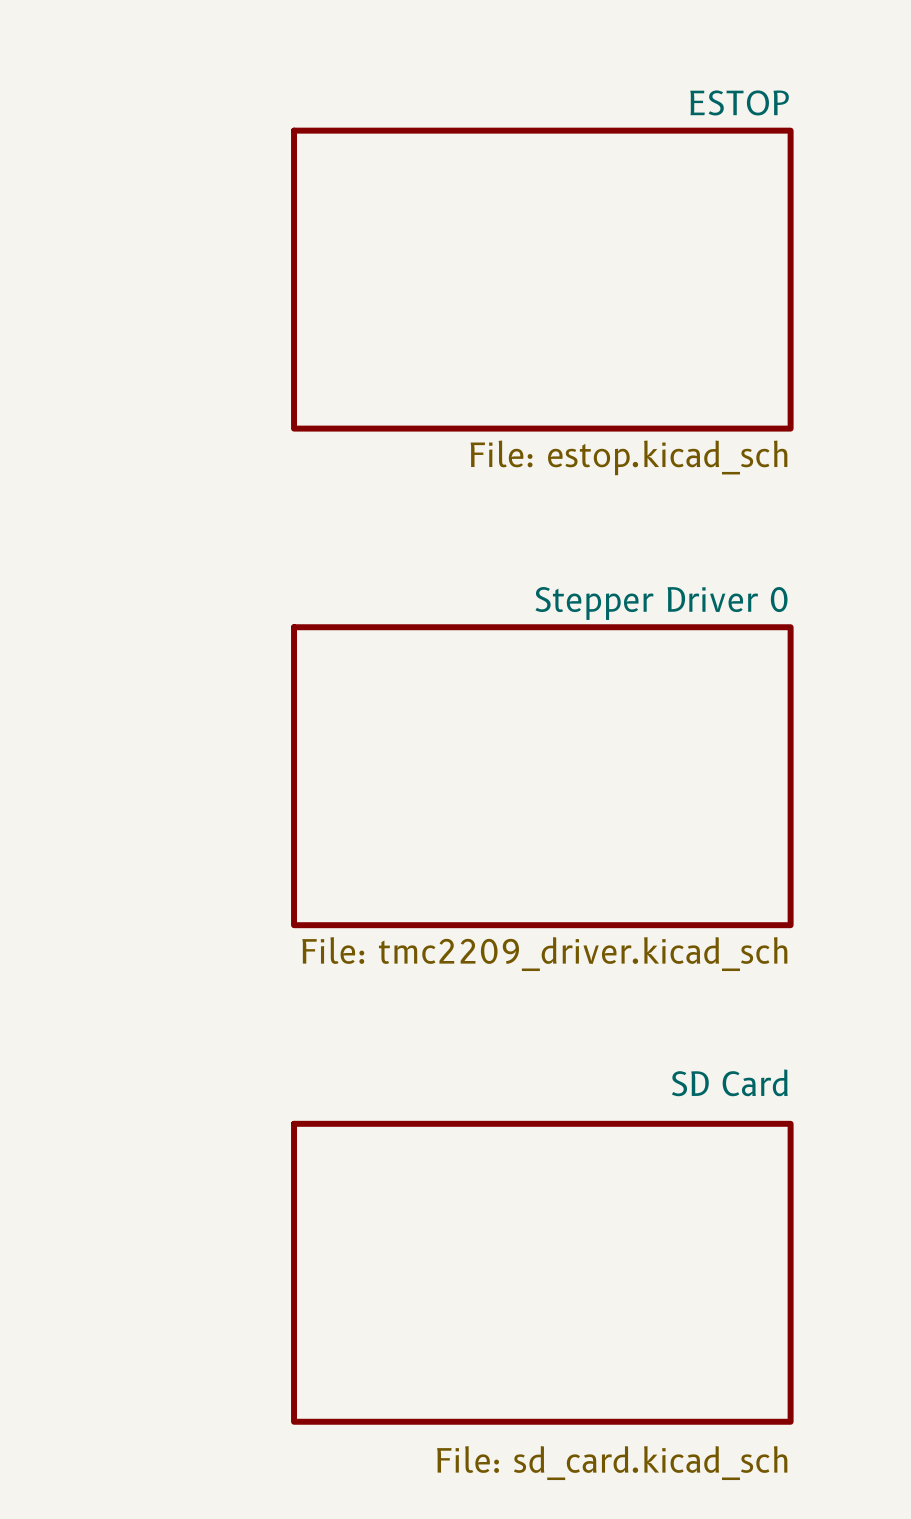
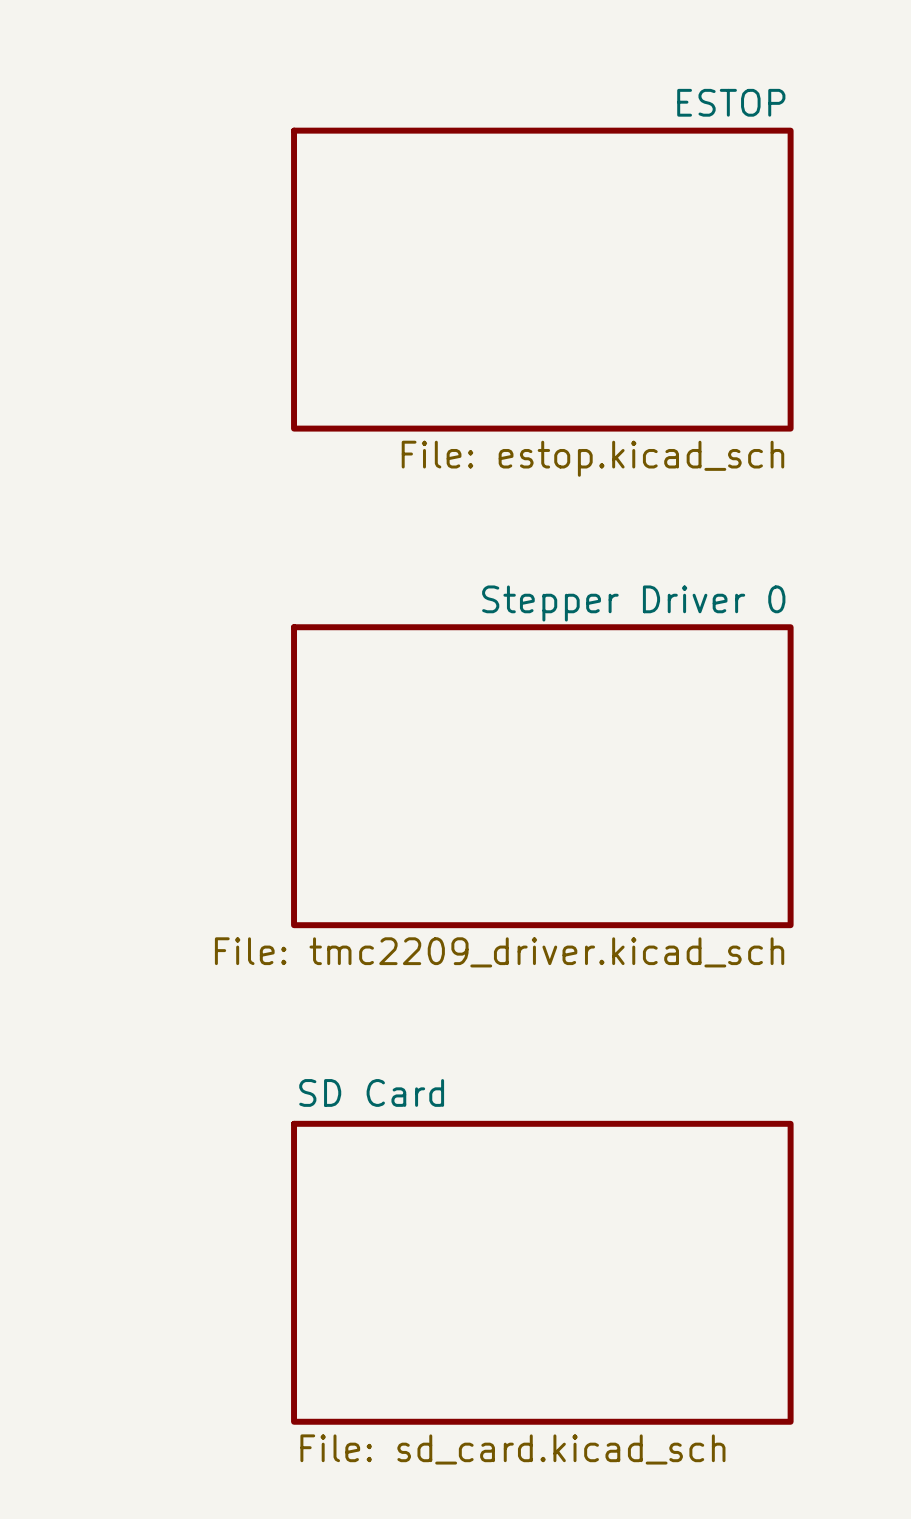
sheet SD Card name position: SD Card (729, 1082) -> SD Card (371, 1092)
sheet SD Card value position: File: sd_card.kicad_sch (612, 1463) -> File: sd_card.kicad_sch (512, 1449)

